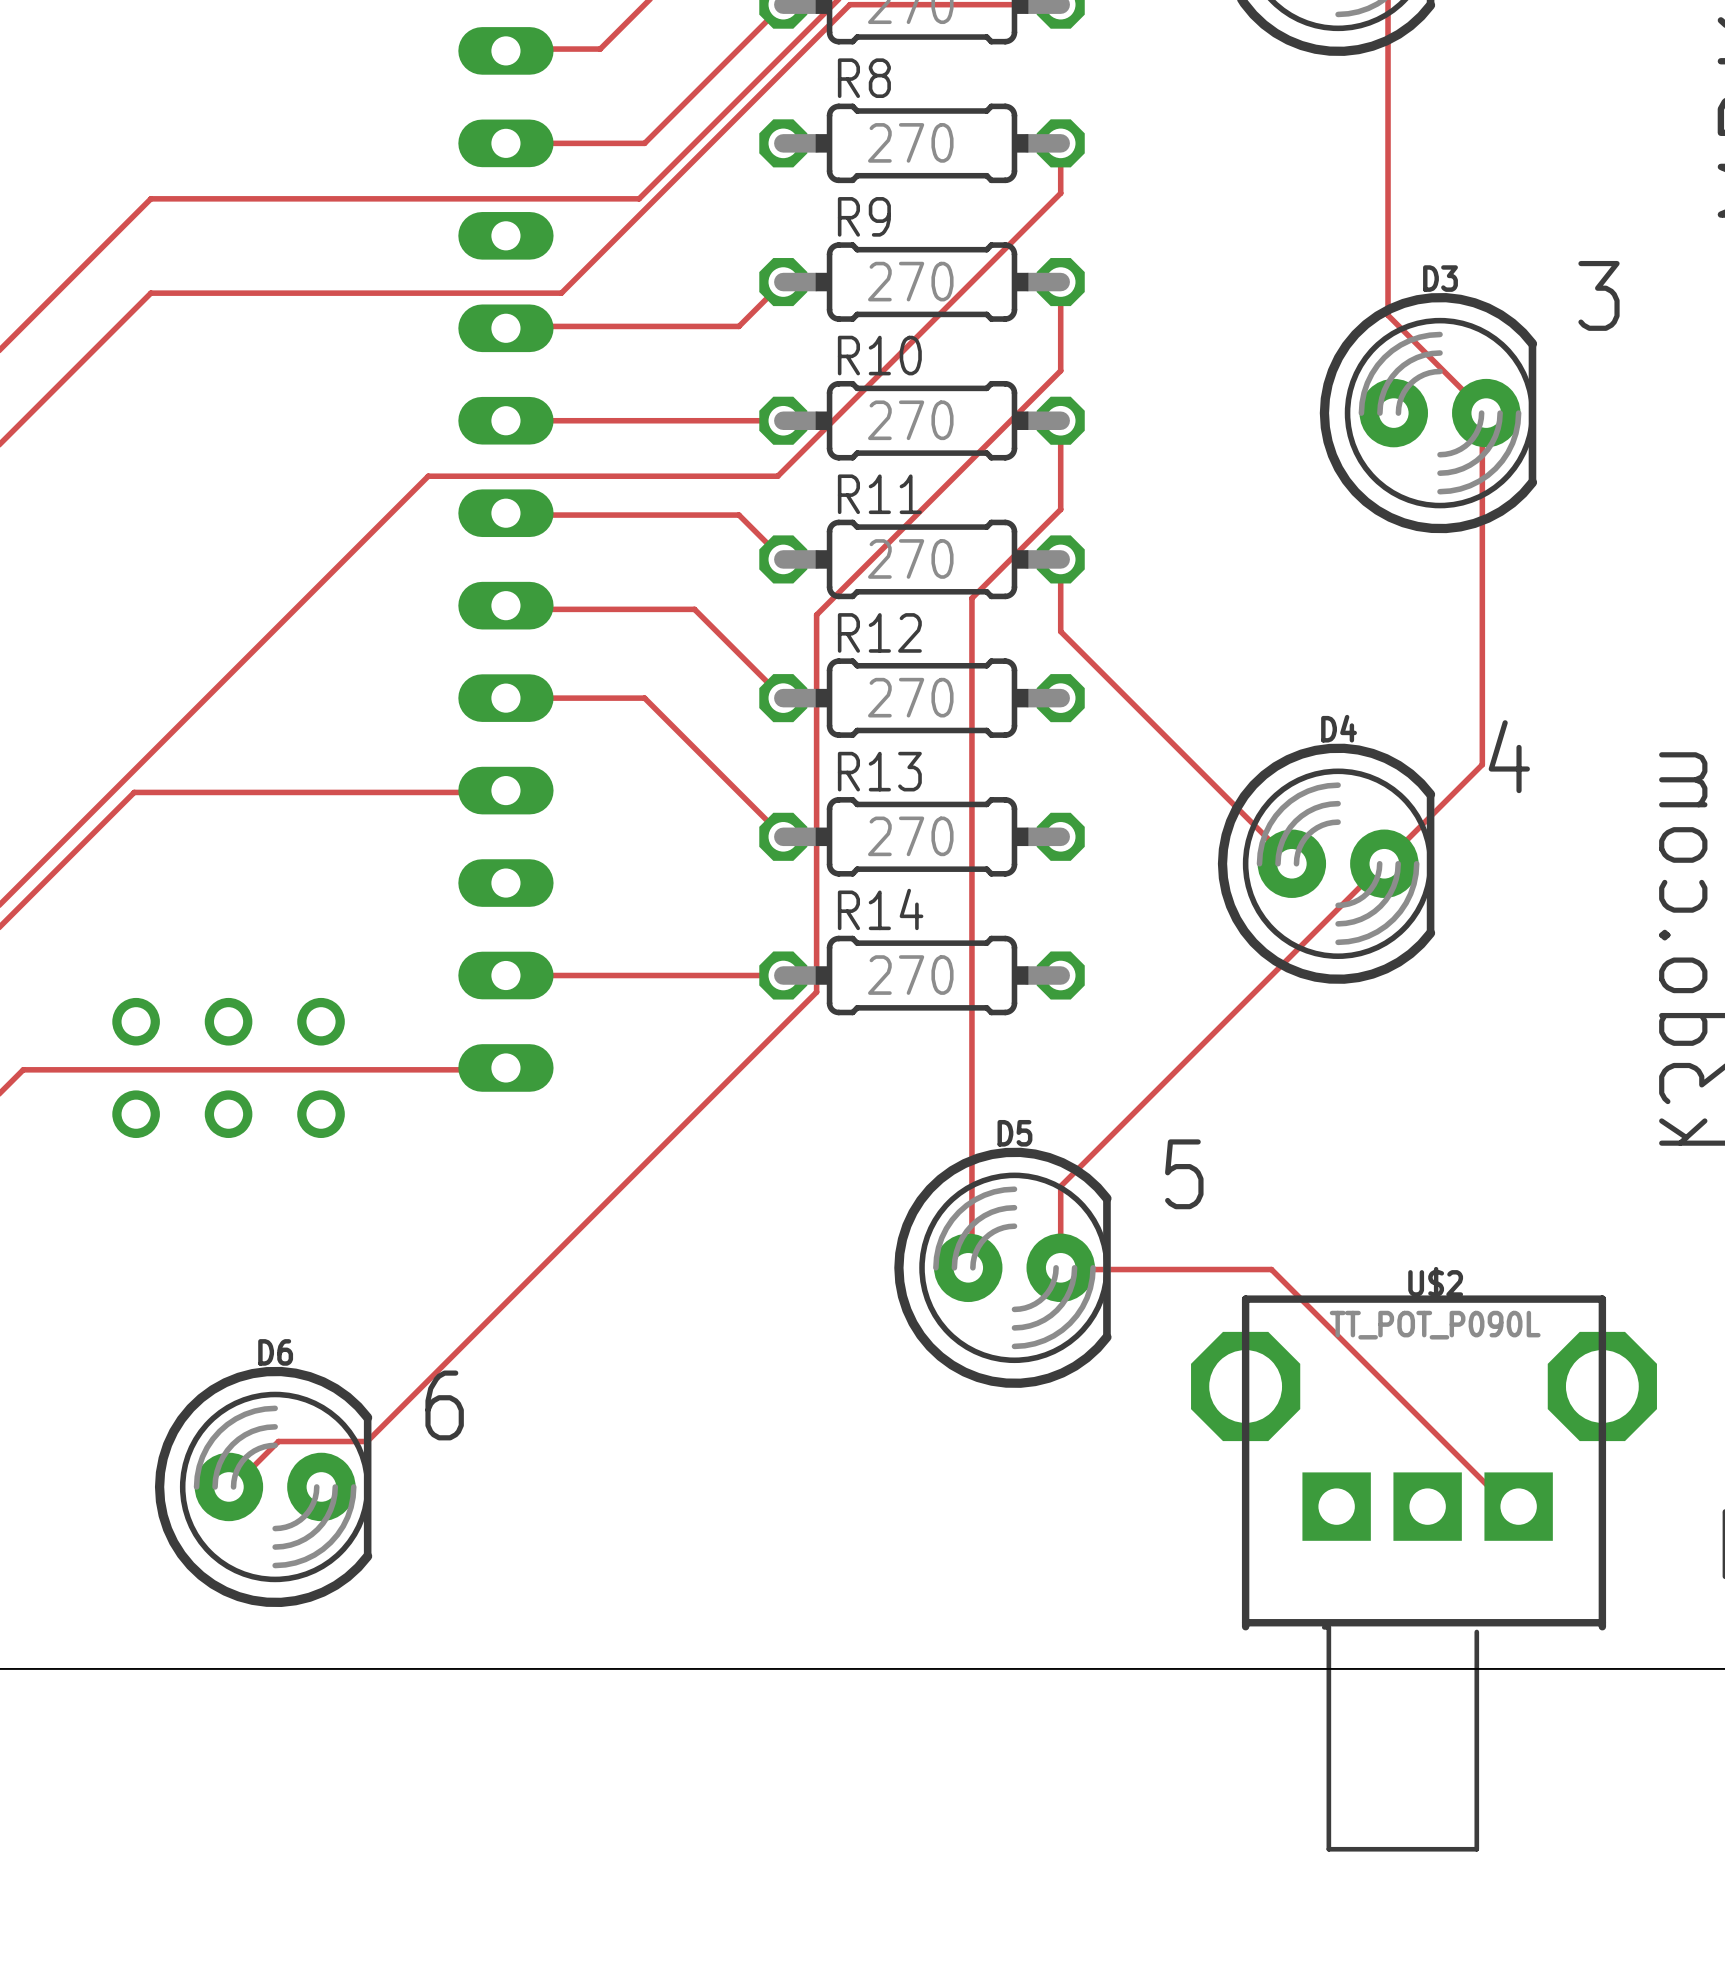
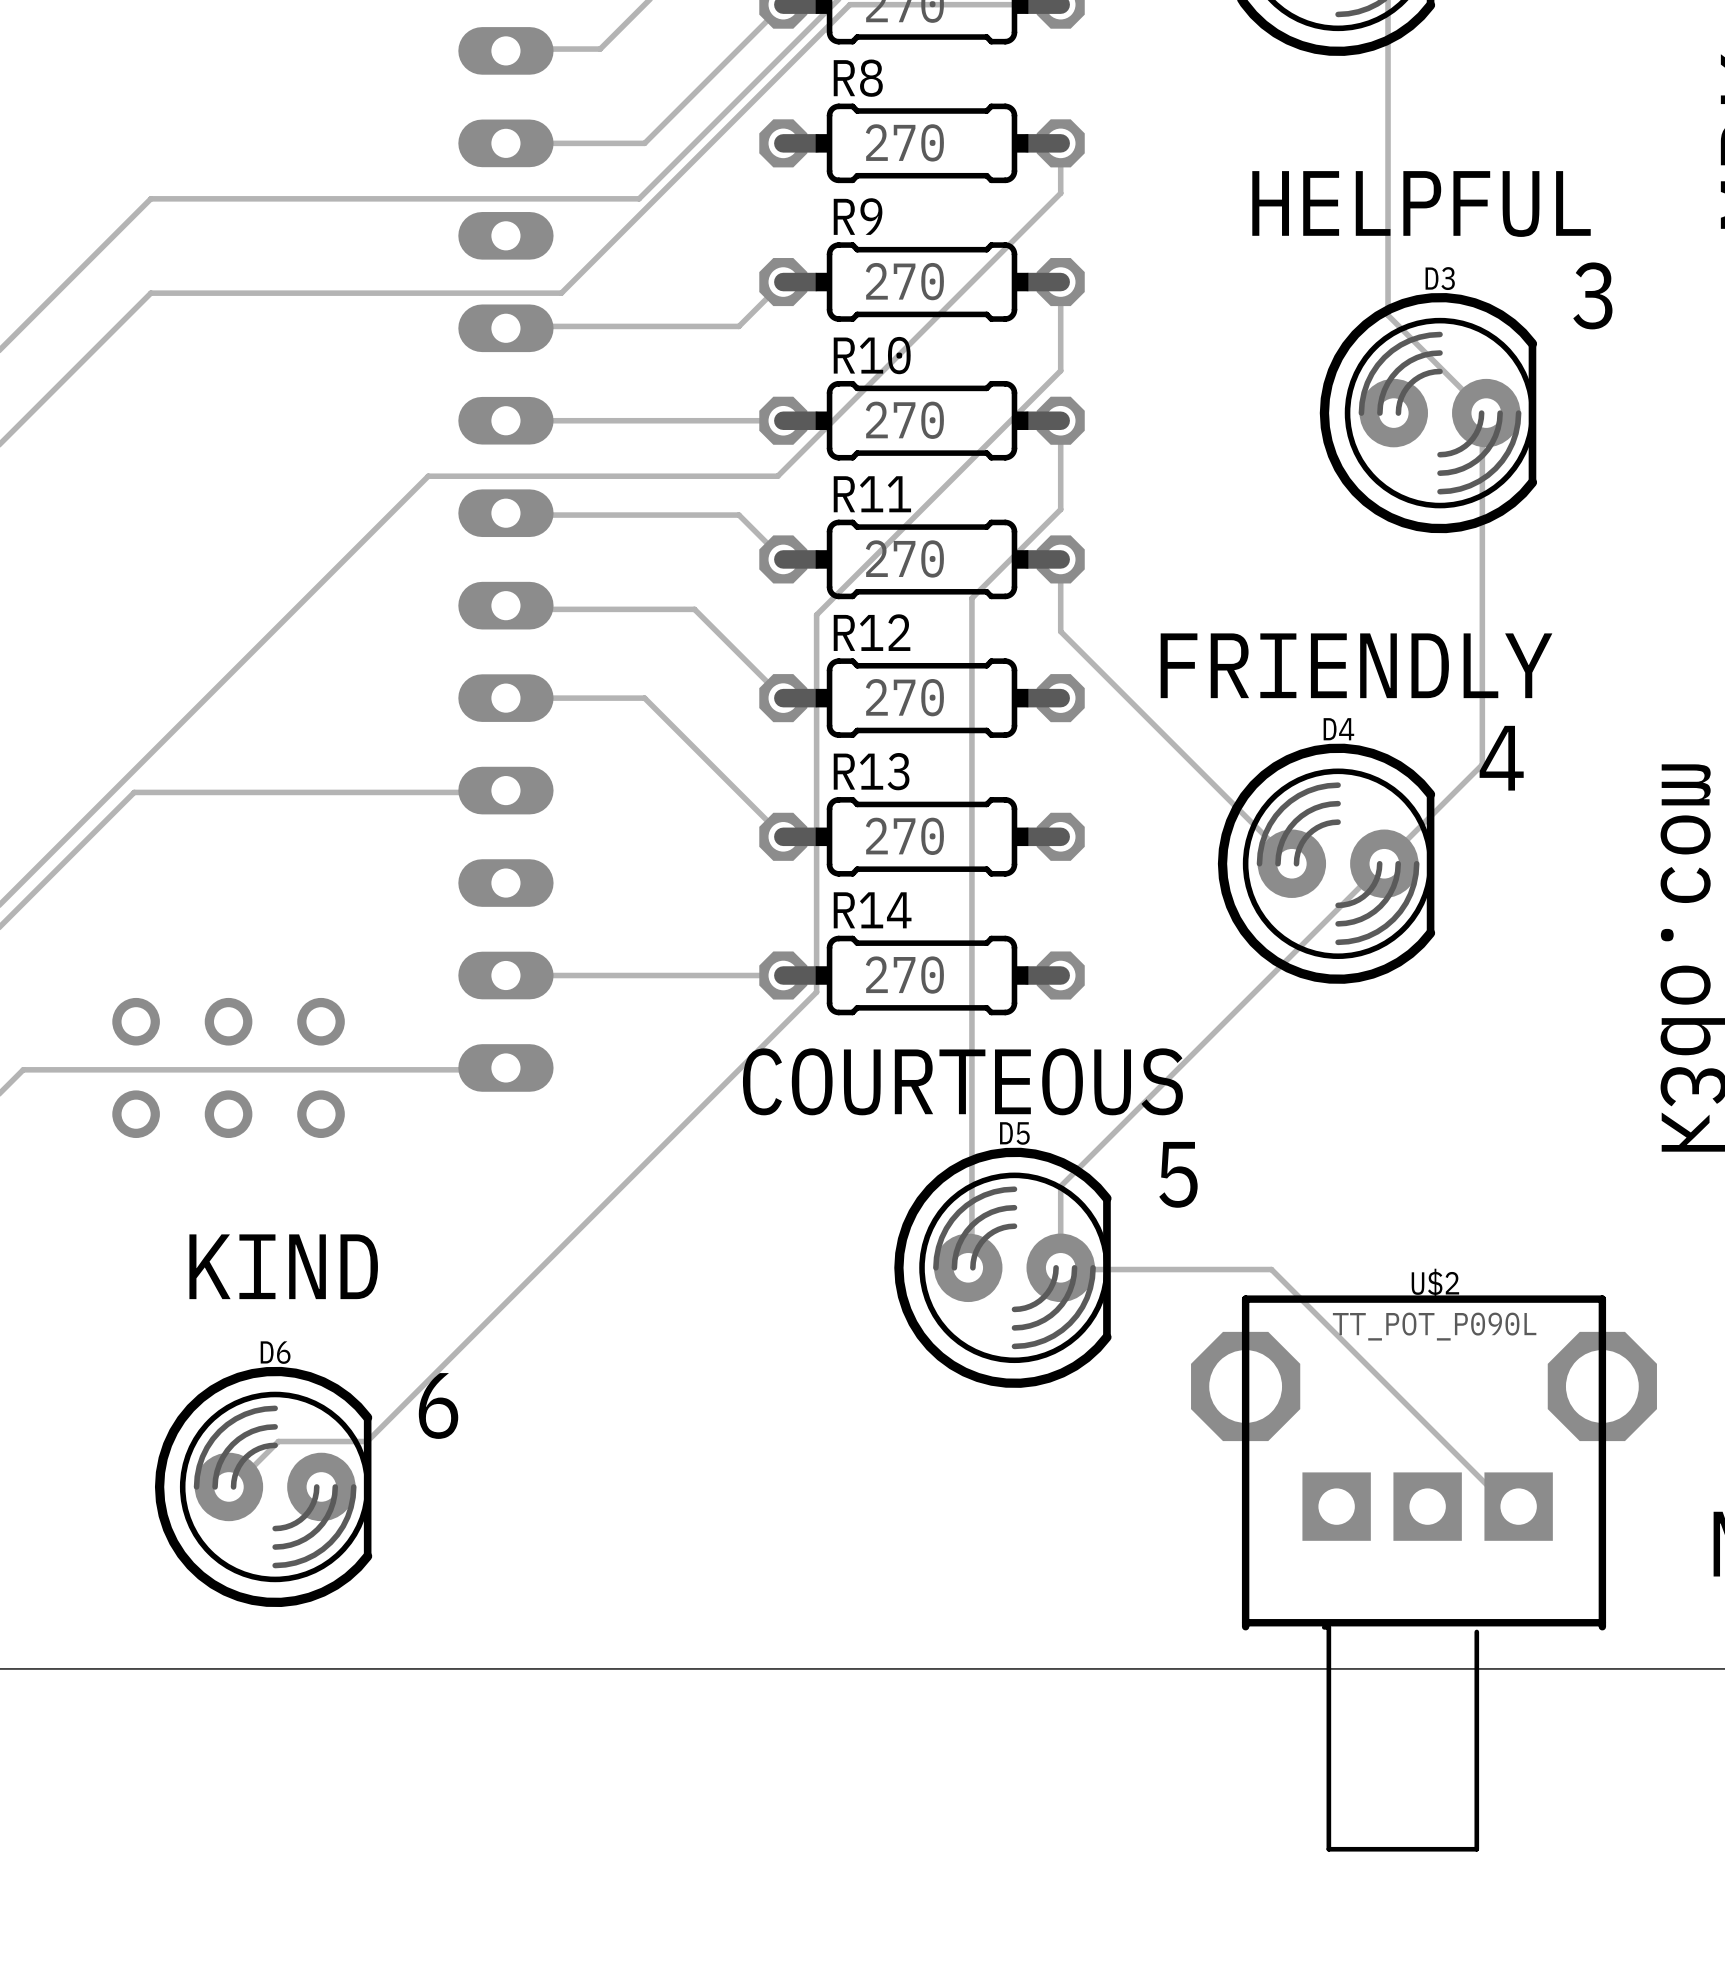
text: none -> HELPFUL (1421, 204)
text: none -> FRIENDLY (1356, 665)
text: none -> COURTEOUS (962, 1081)
text: none -> KIND (283, 1266)

